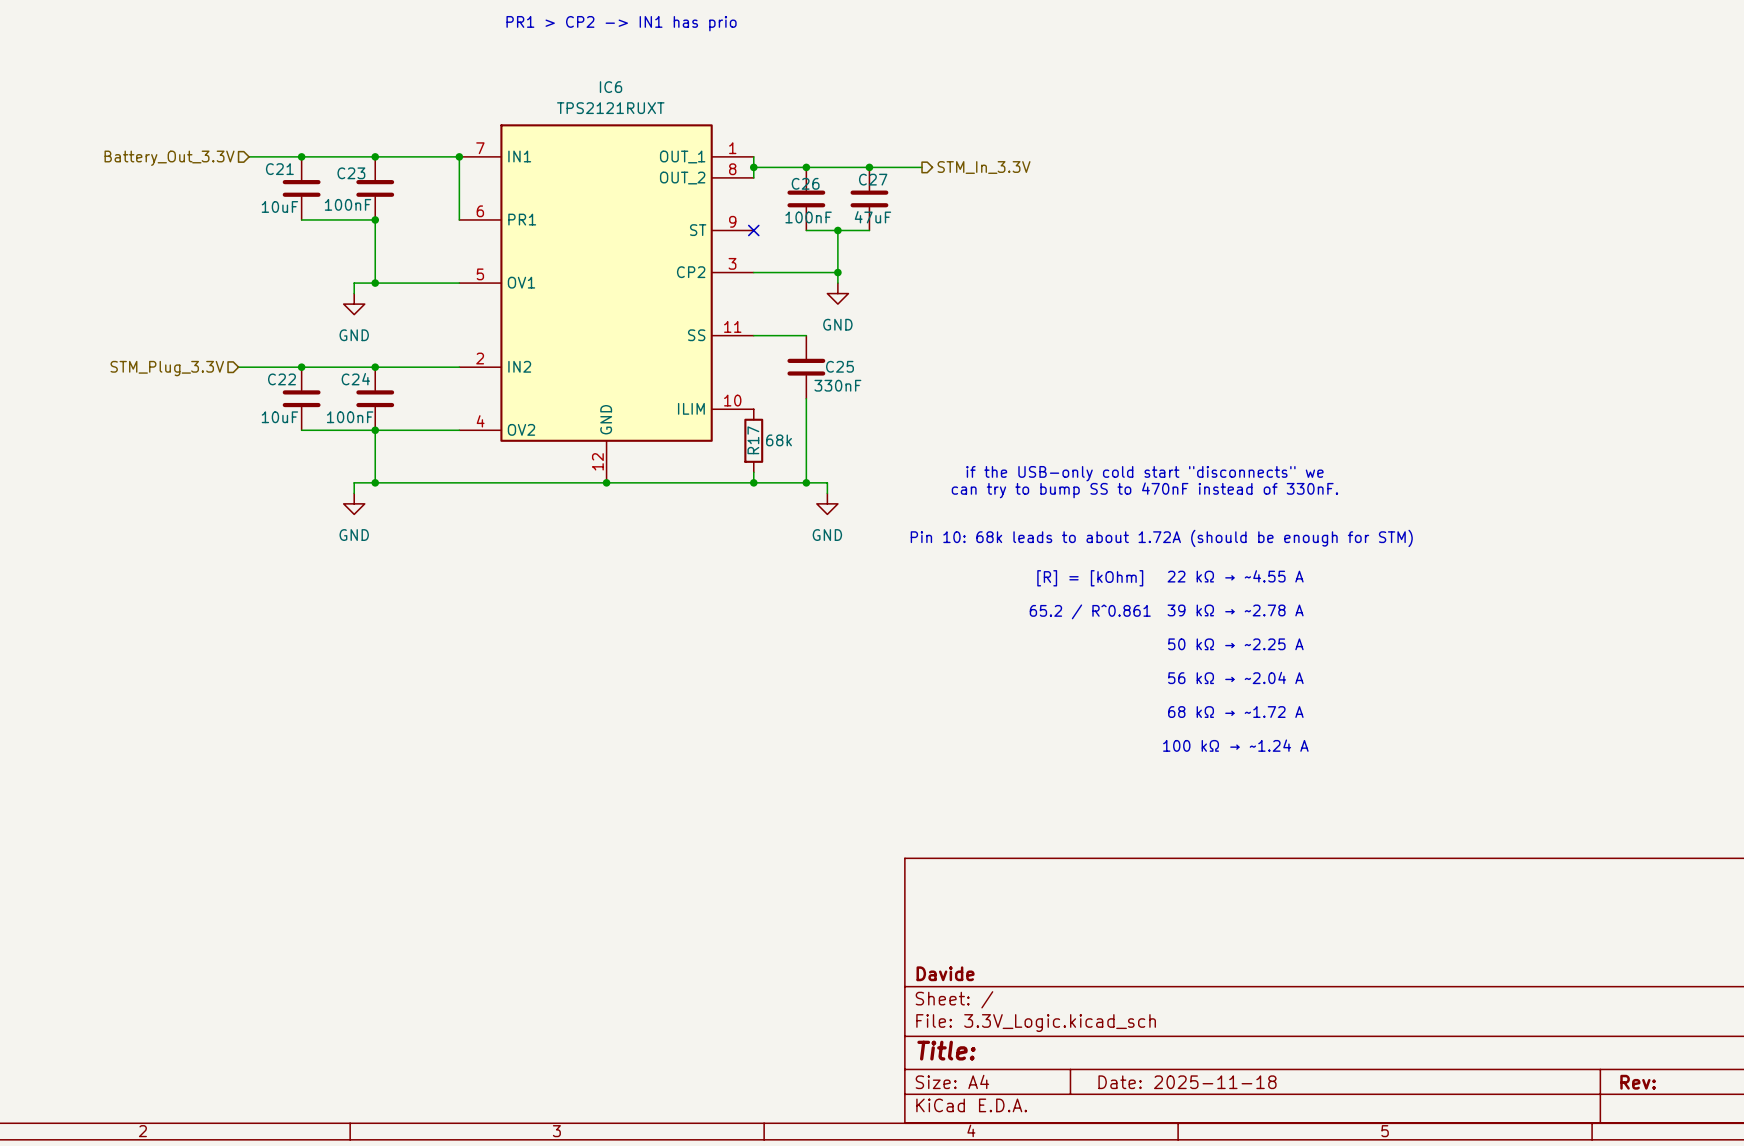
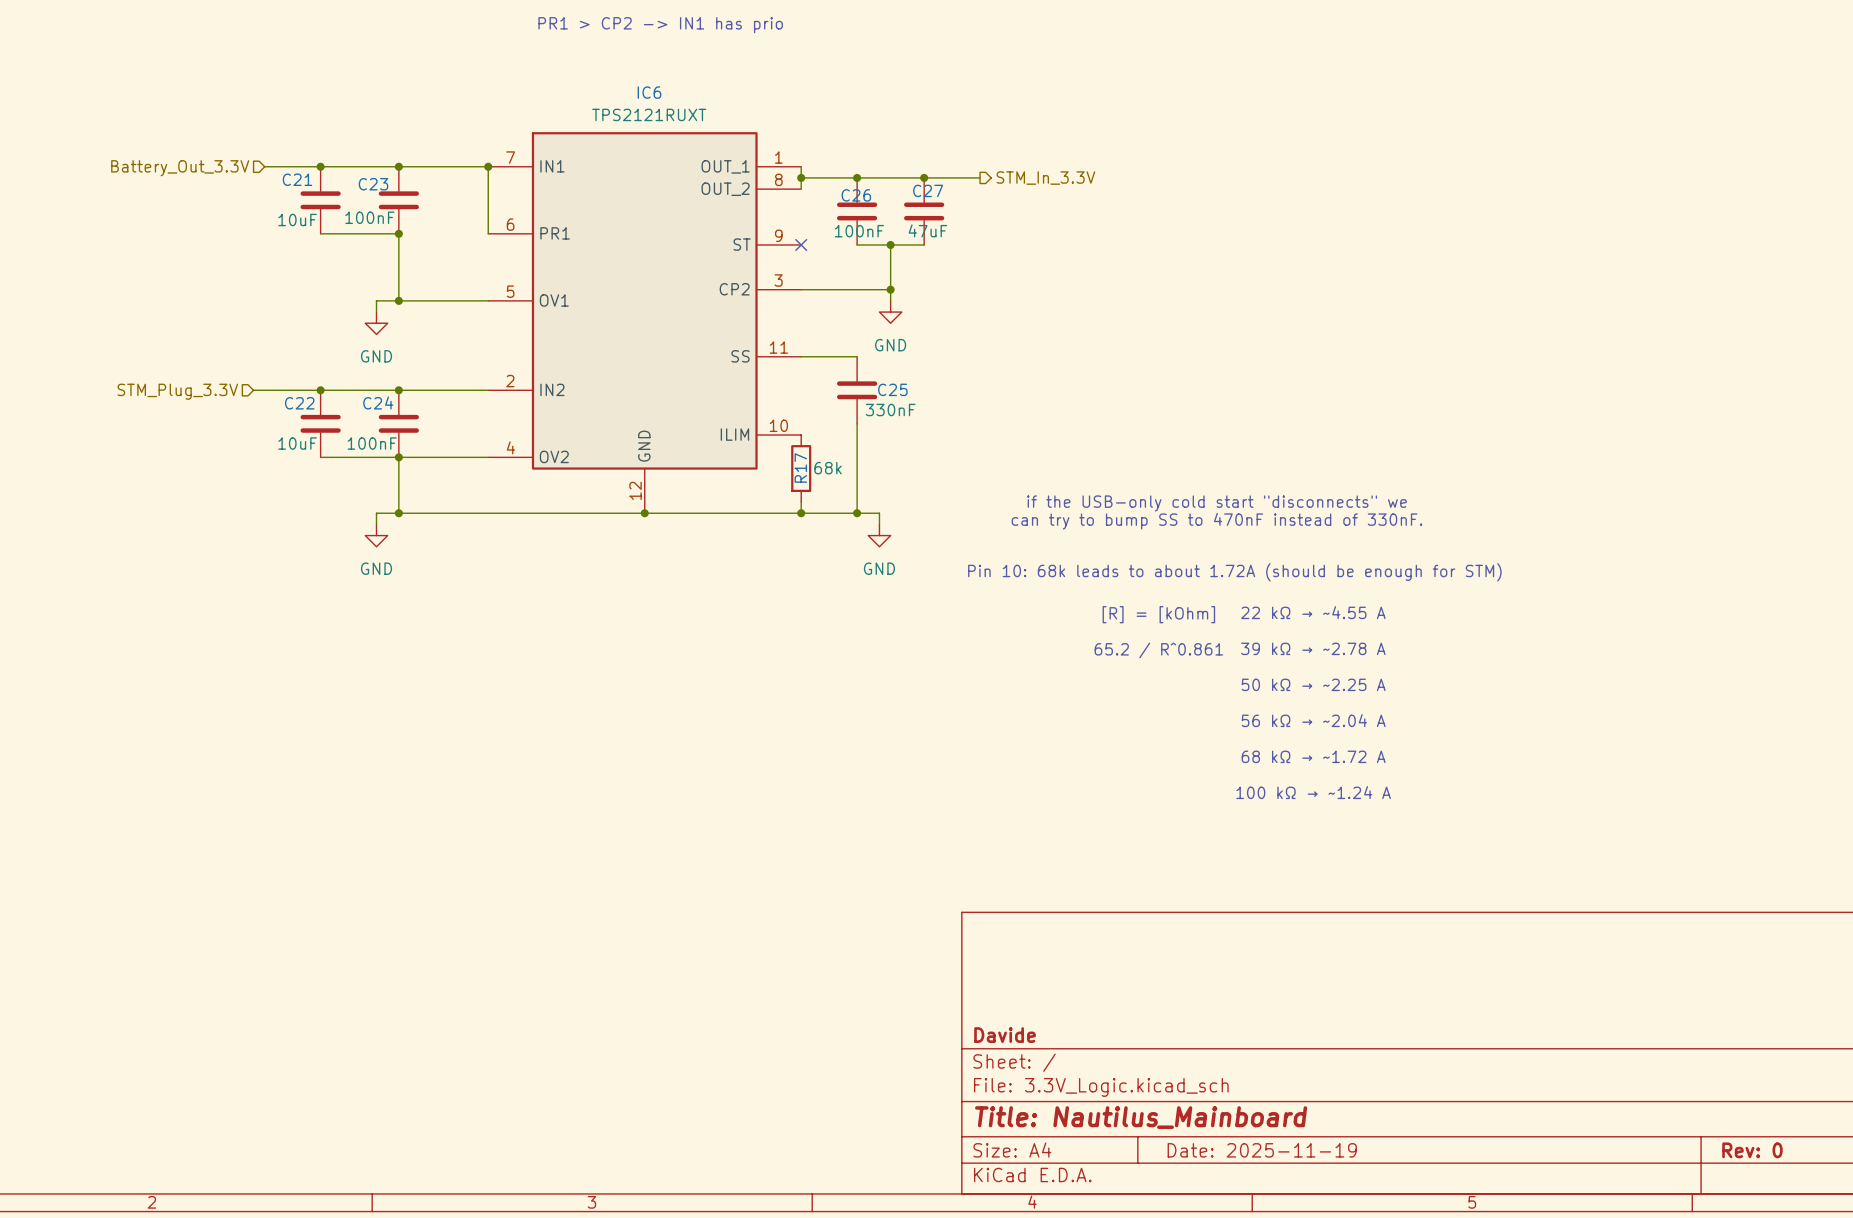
title block: Title: (946, 1050) -> Title: Nautilus_Mainboard (1141, 1117)
title block: Date: 2025-11-18 (1187, 1082) -> Date: 2025-11-19 (1262, 1150)
title block: Rev: (1638, 1082) -> Rev: 0 (1752, 1150)

